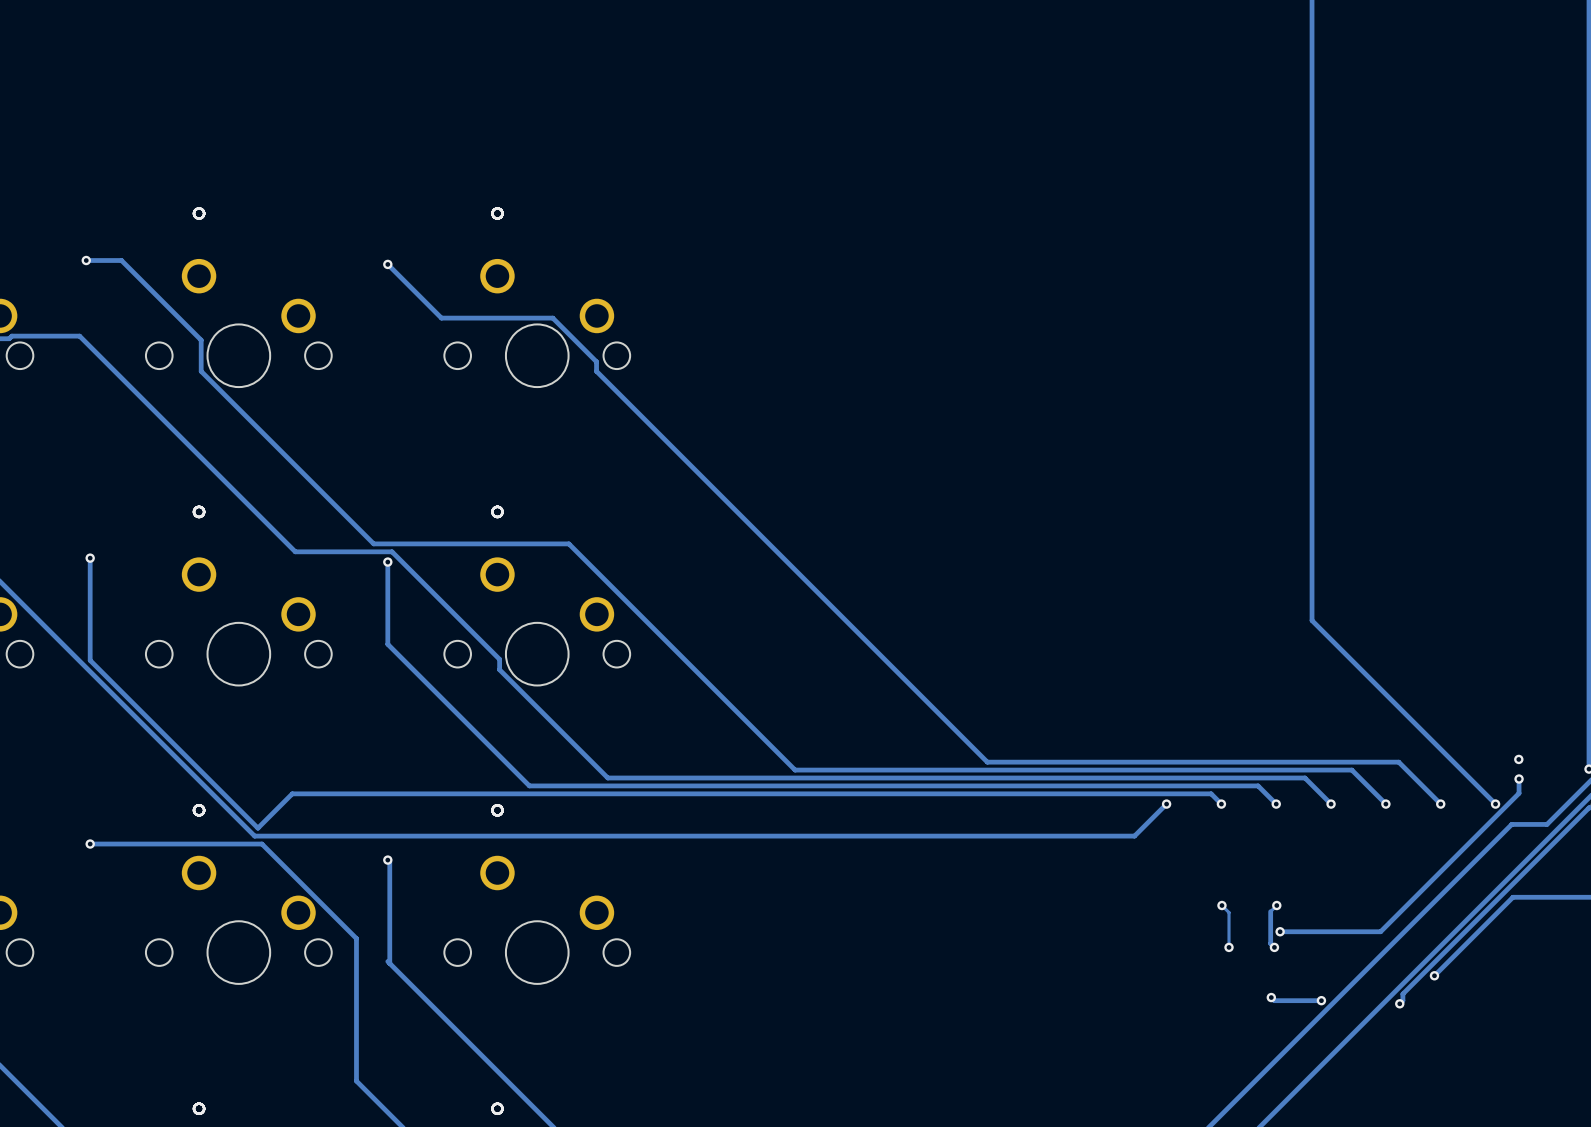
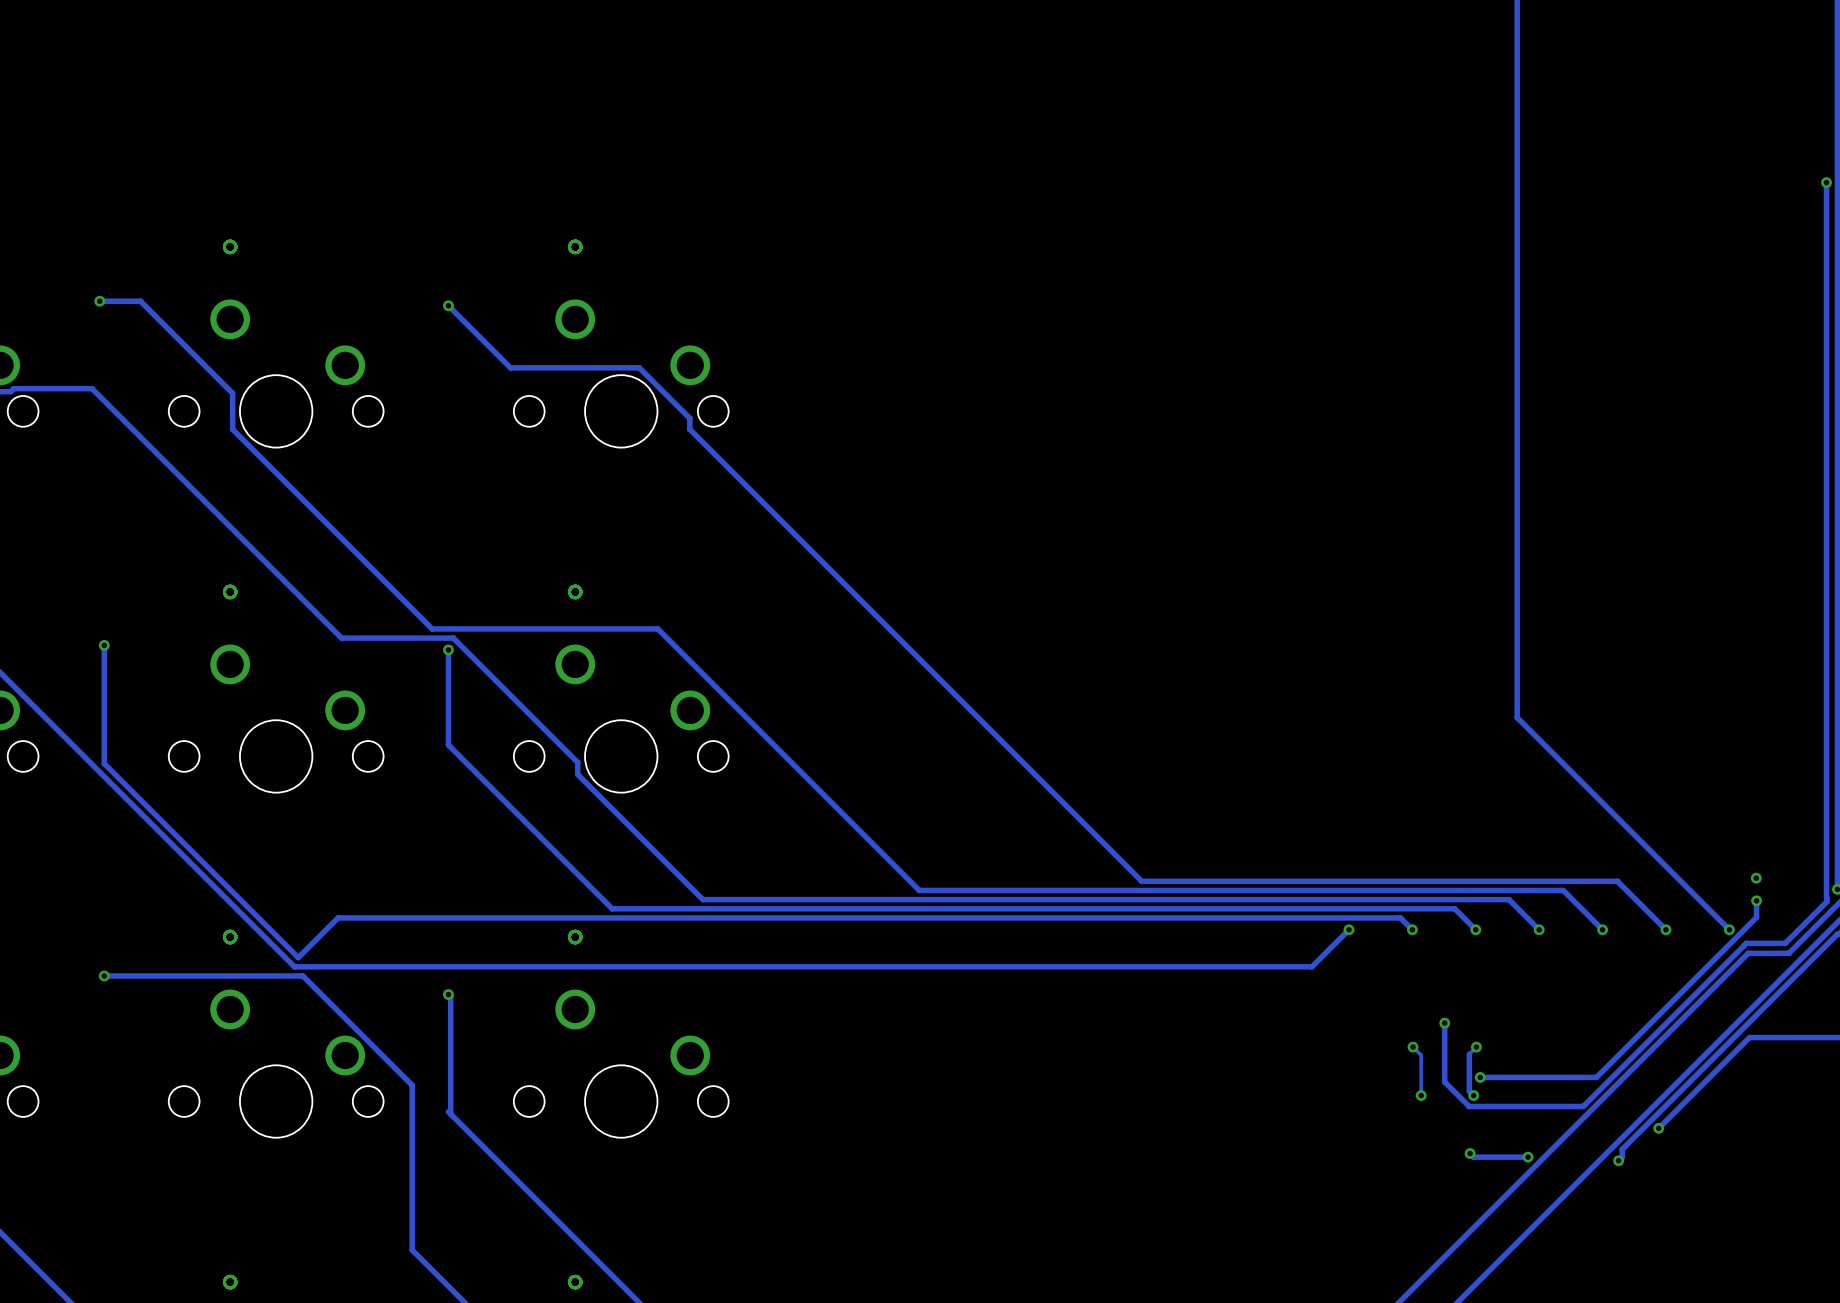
track: none -> (1826, 182) (1826, 901) (1785, 943) (1746, 943) (1583, 1106) (1469, 1106) (1444, 1082) (1444, 1023)
via: none -> (1826, 182)
via: none -> (1444, 1023)

